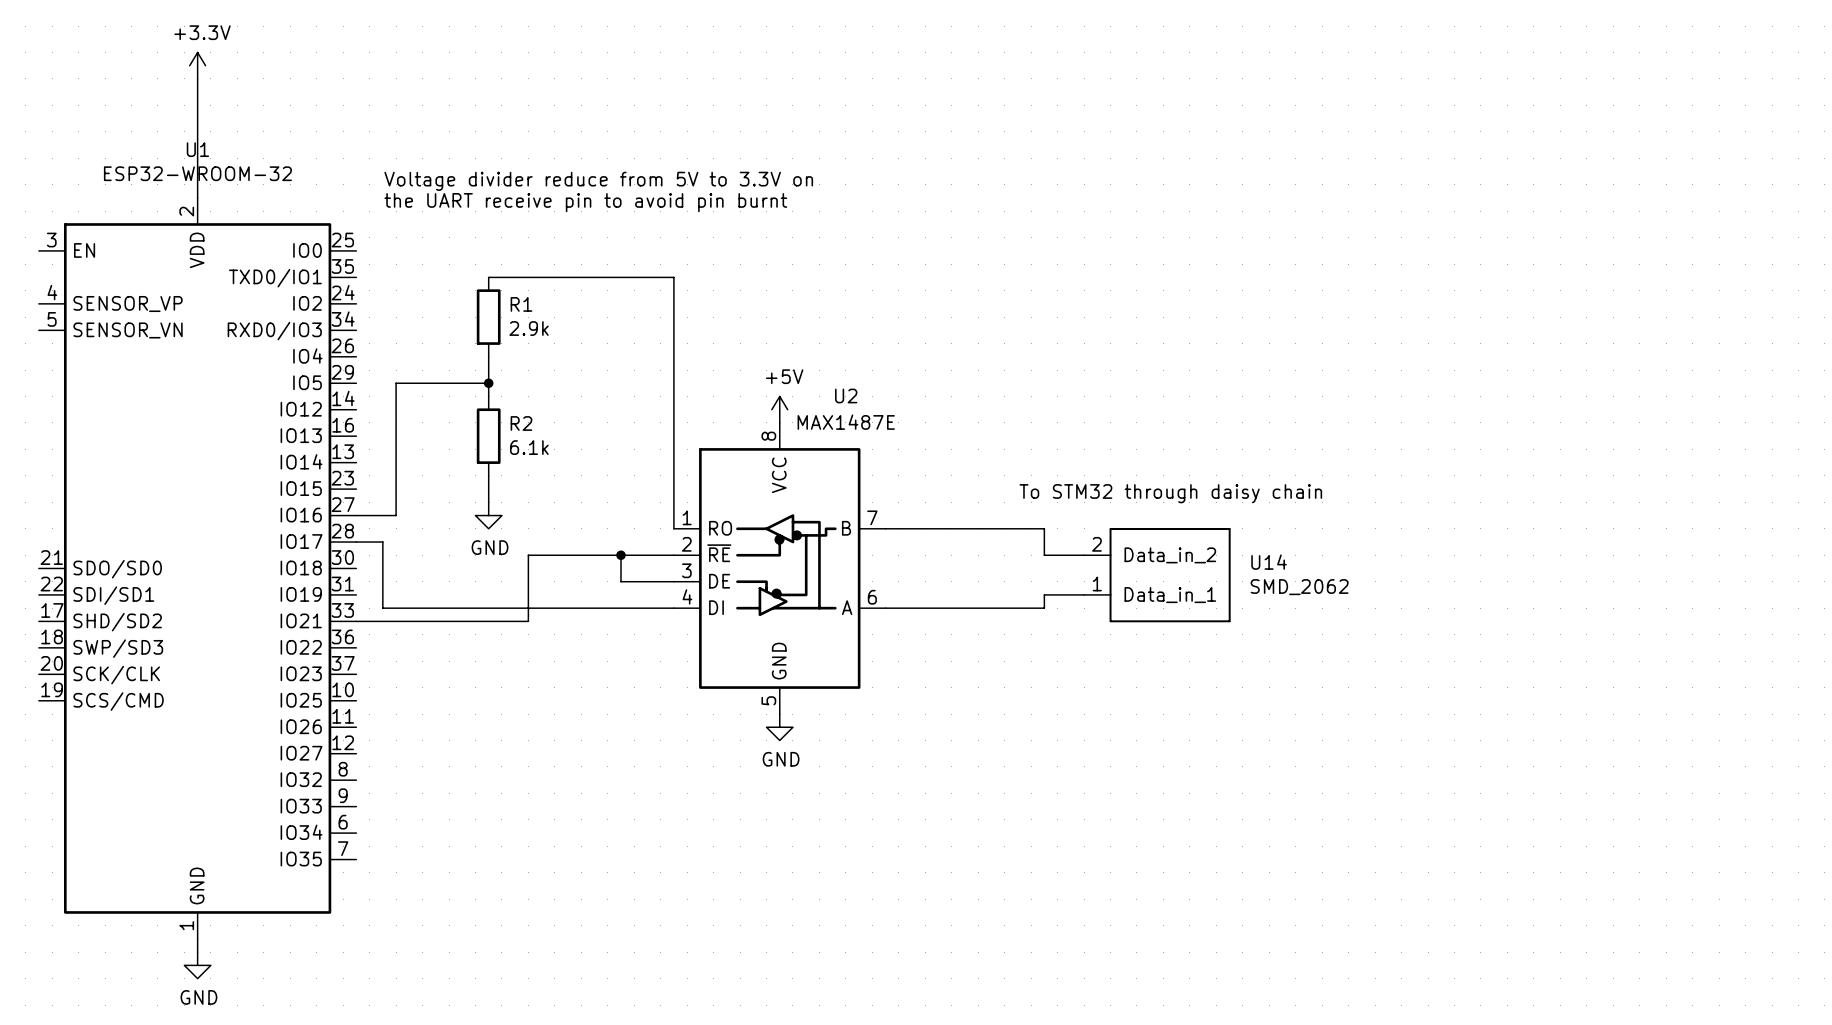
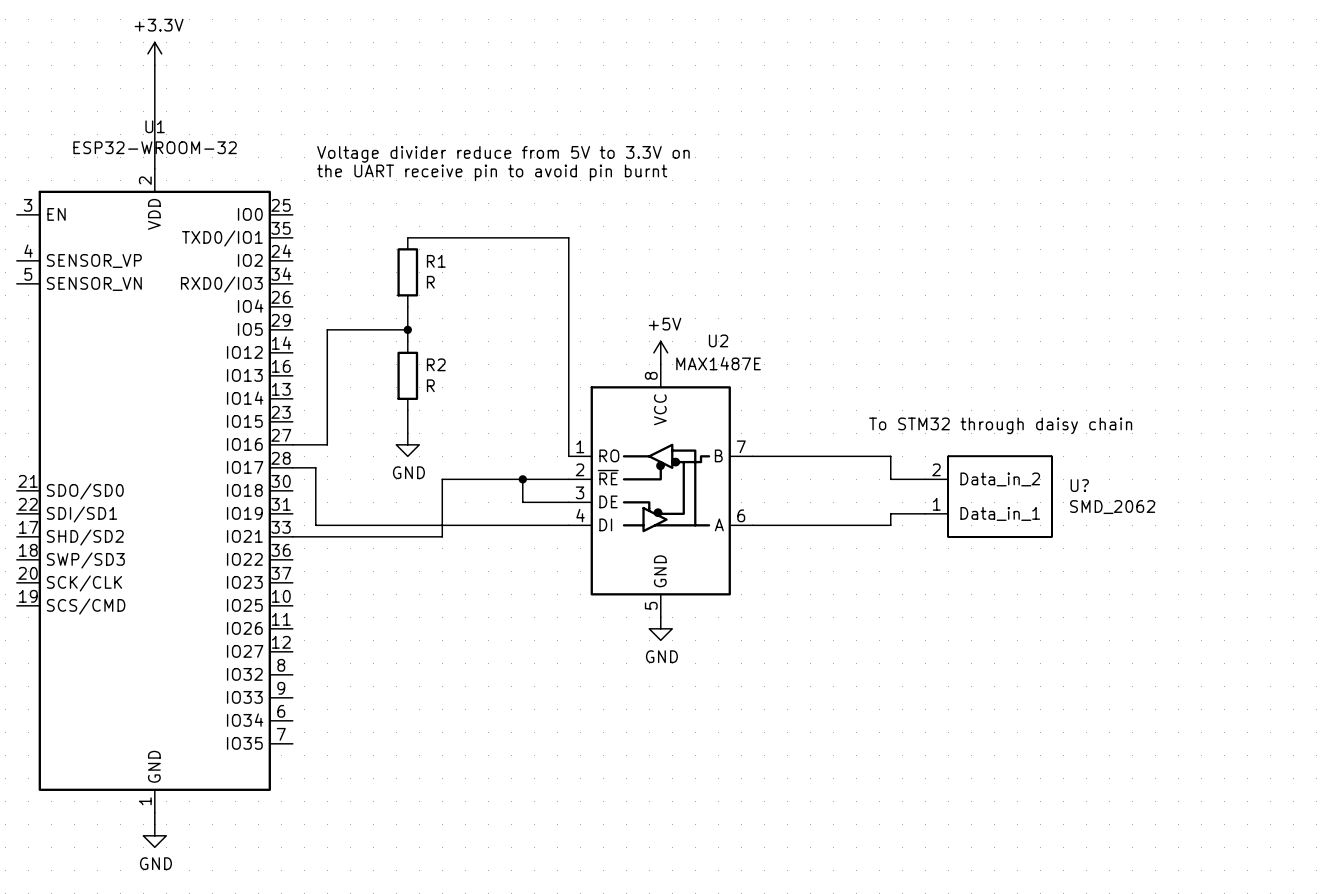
R1 value: 2.9k (529, 328) -> R (430, 282)
R2 value: 6.1k (529, 447) -> R (430, 385)
U14 name: U14 (1269, 562) -> U? (1079, 485)

